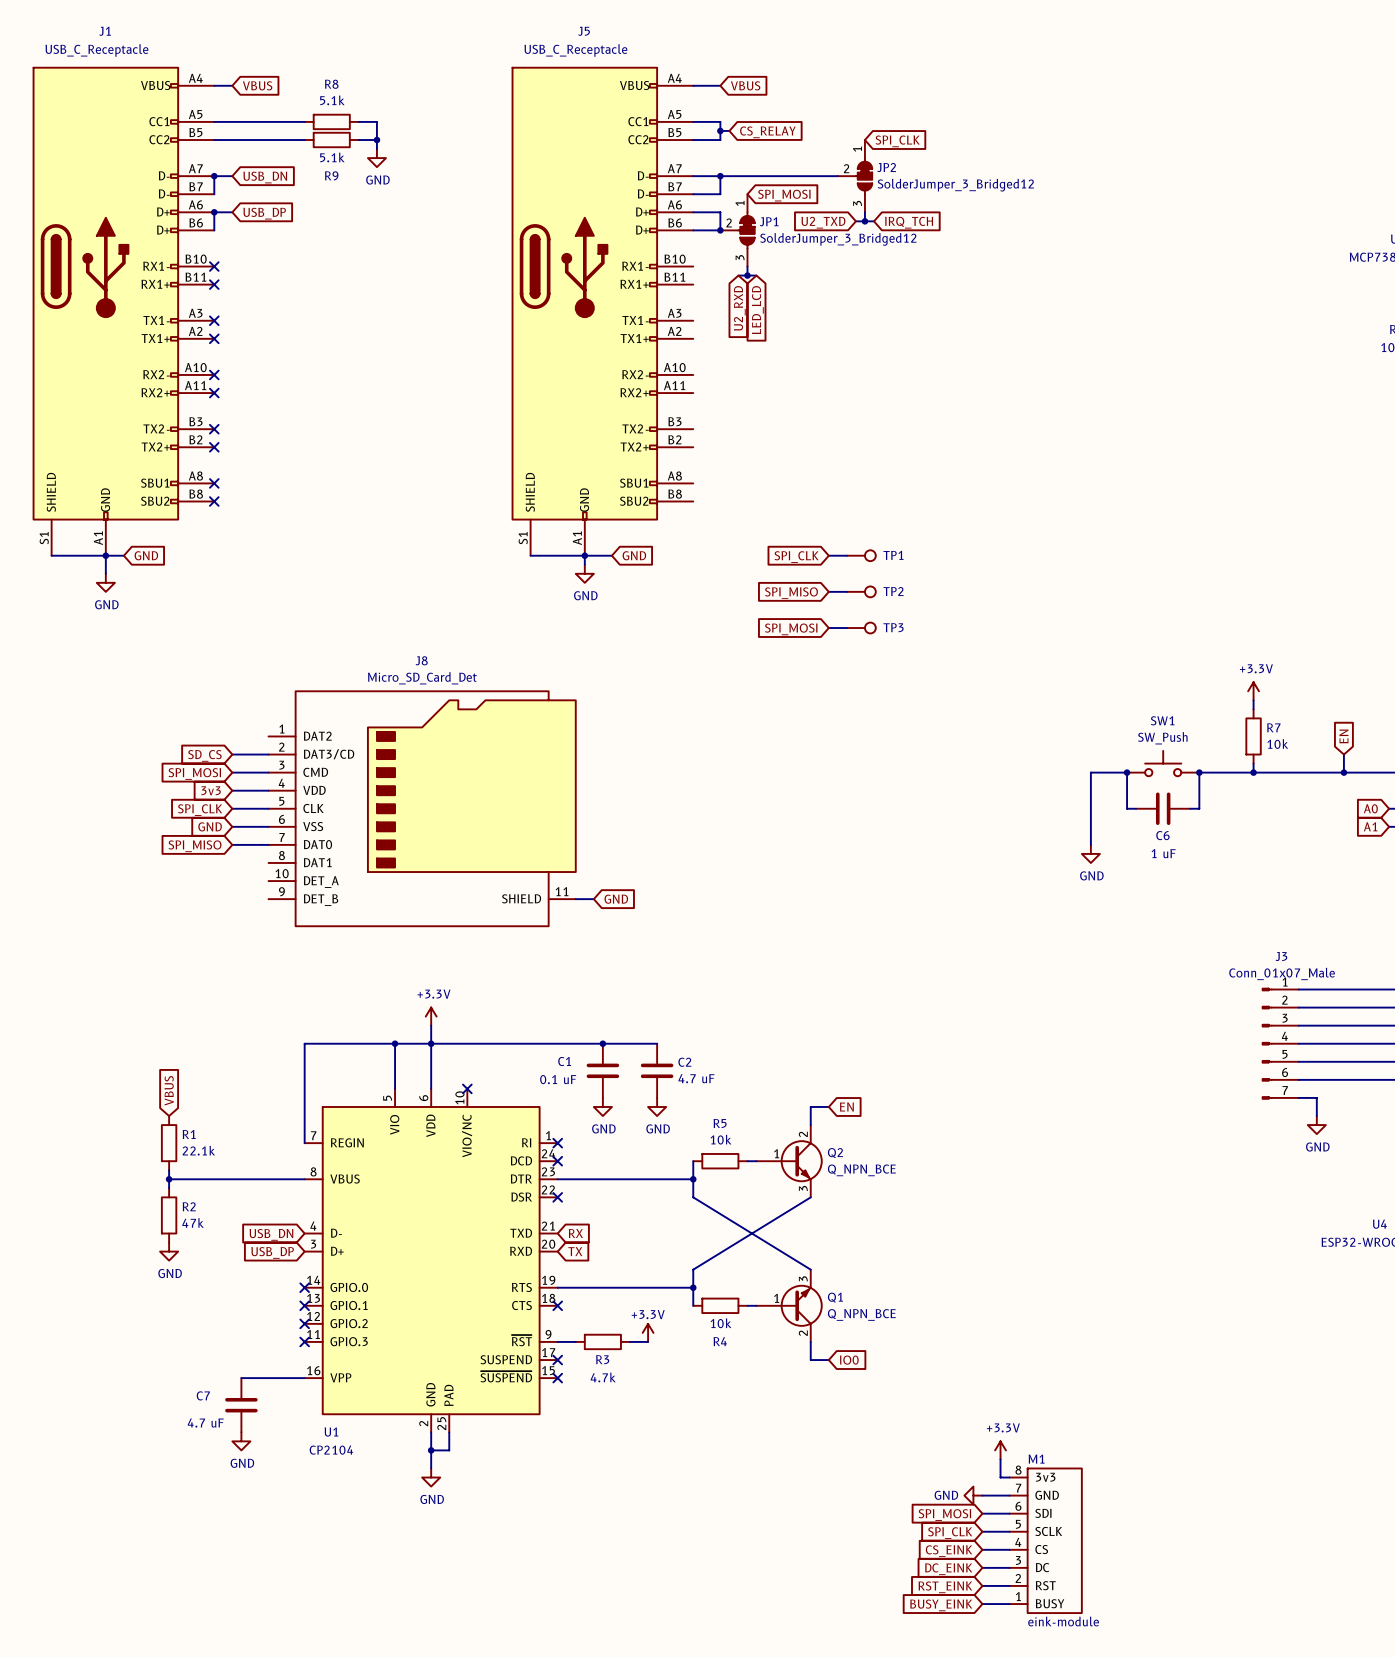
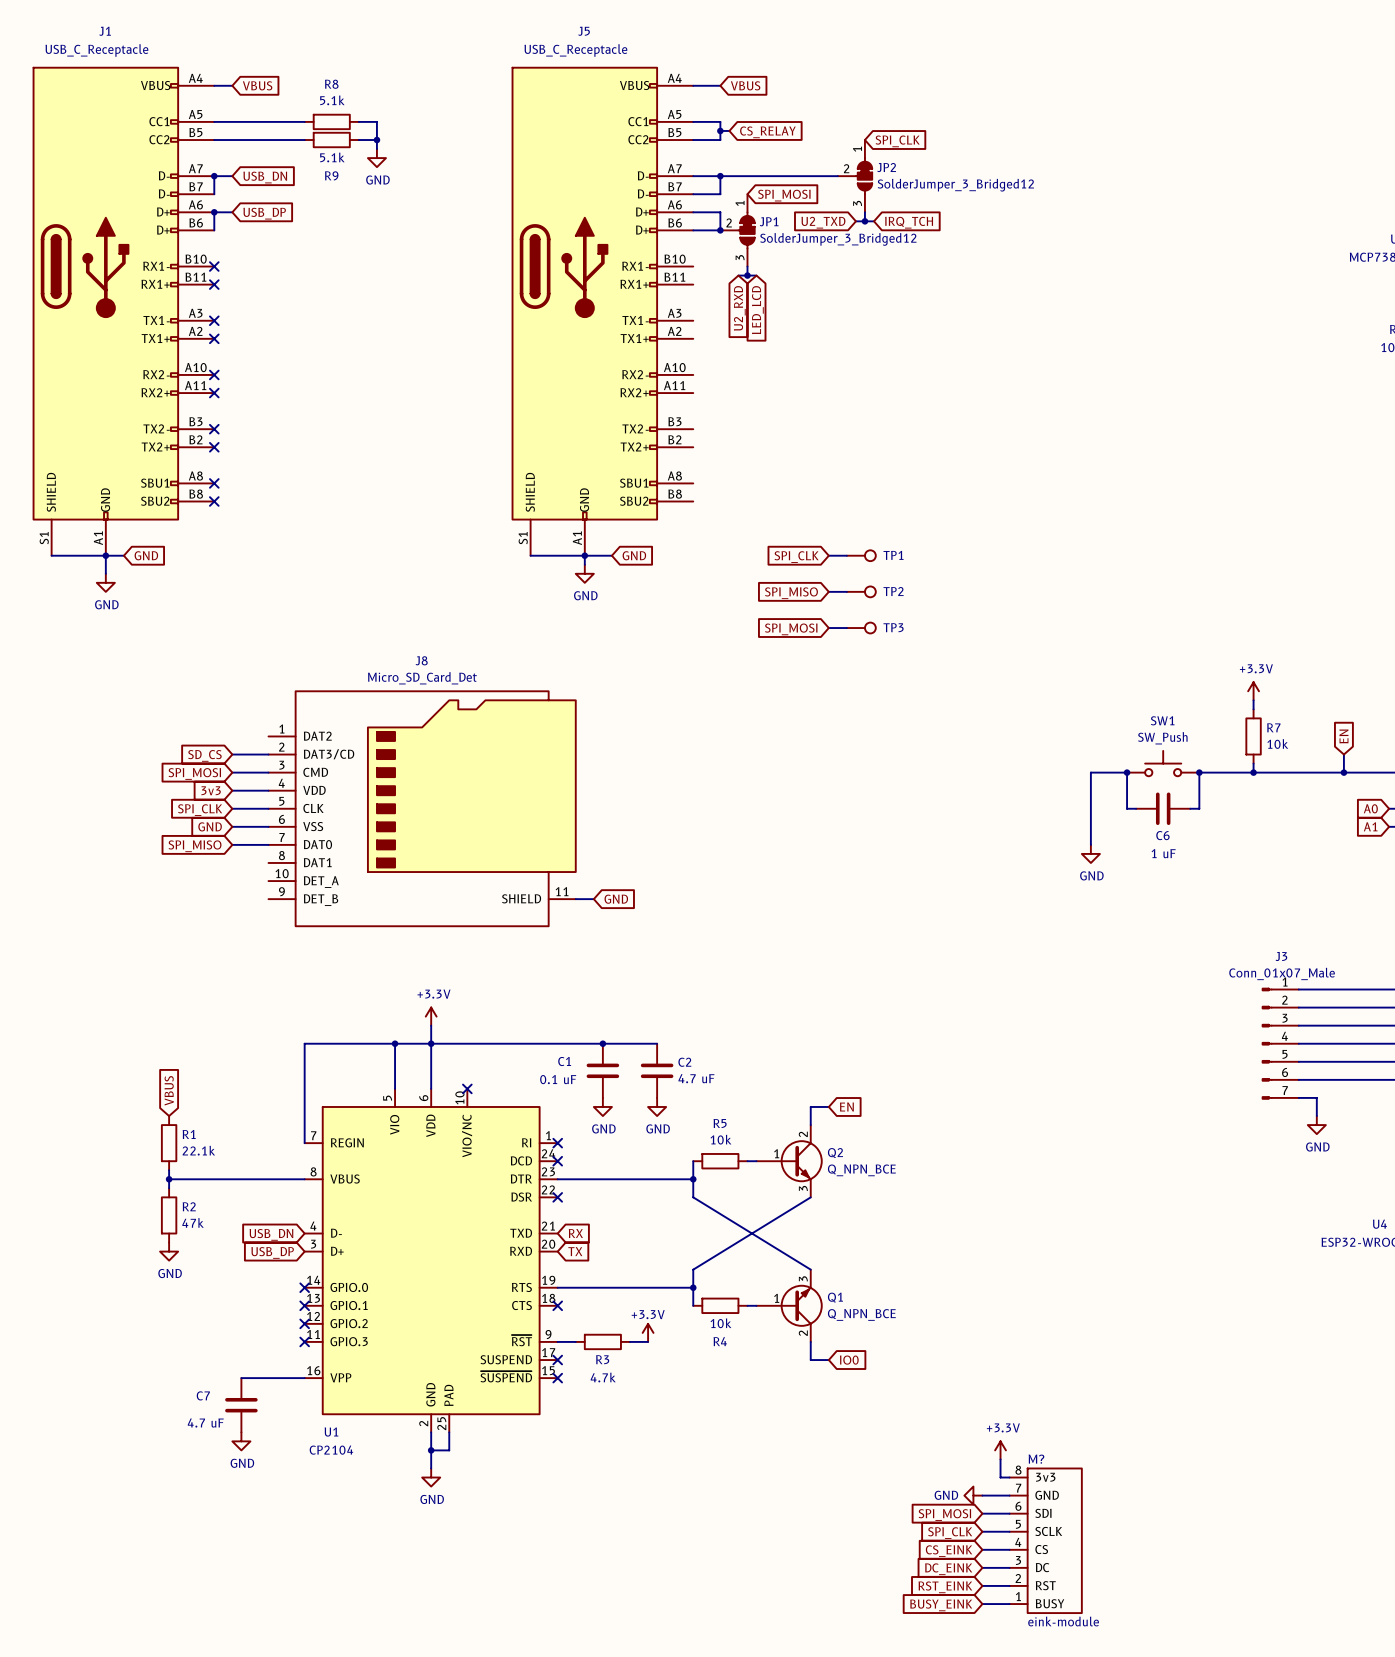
M1 name: M1 (1036, 1459) -> M? (1036, 1459)

